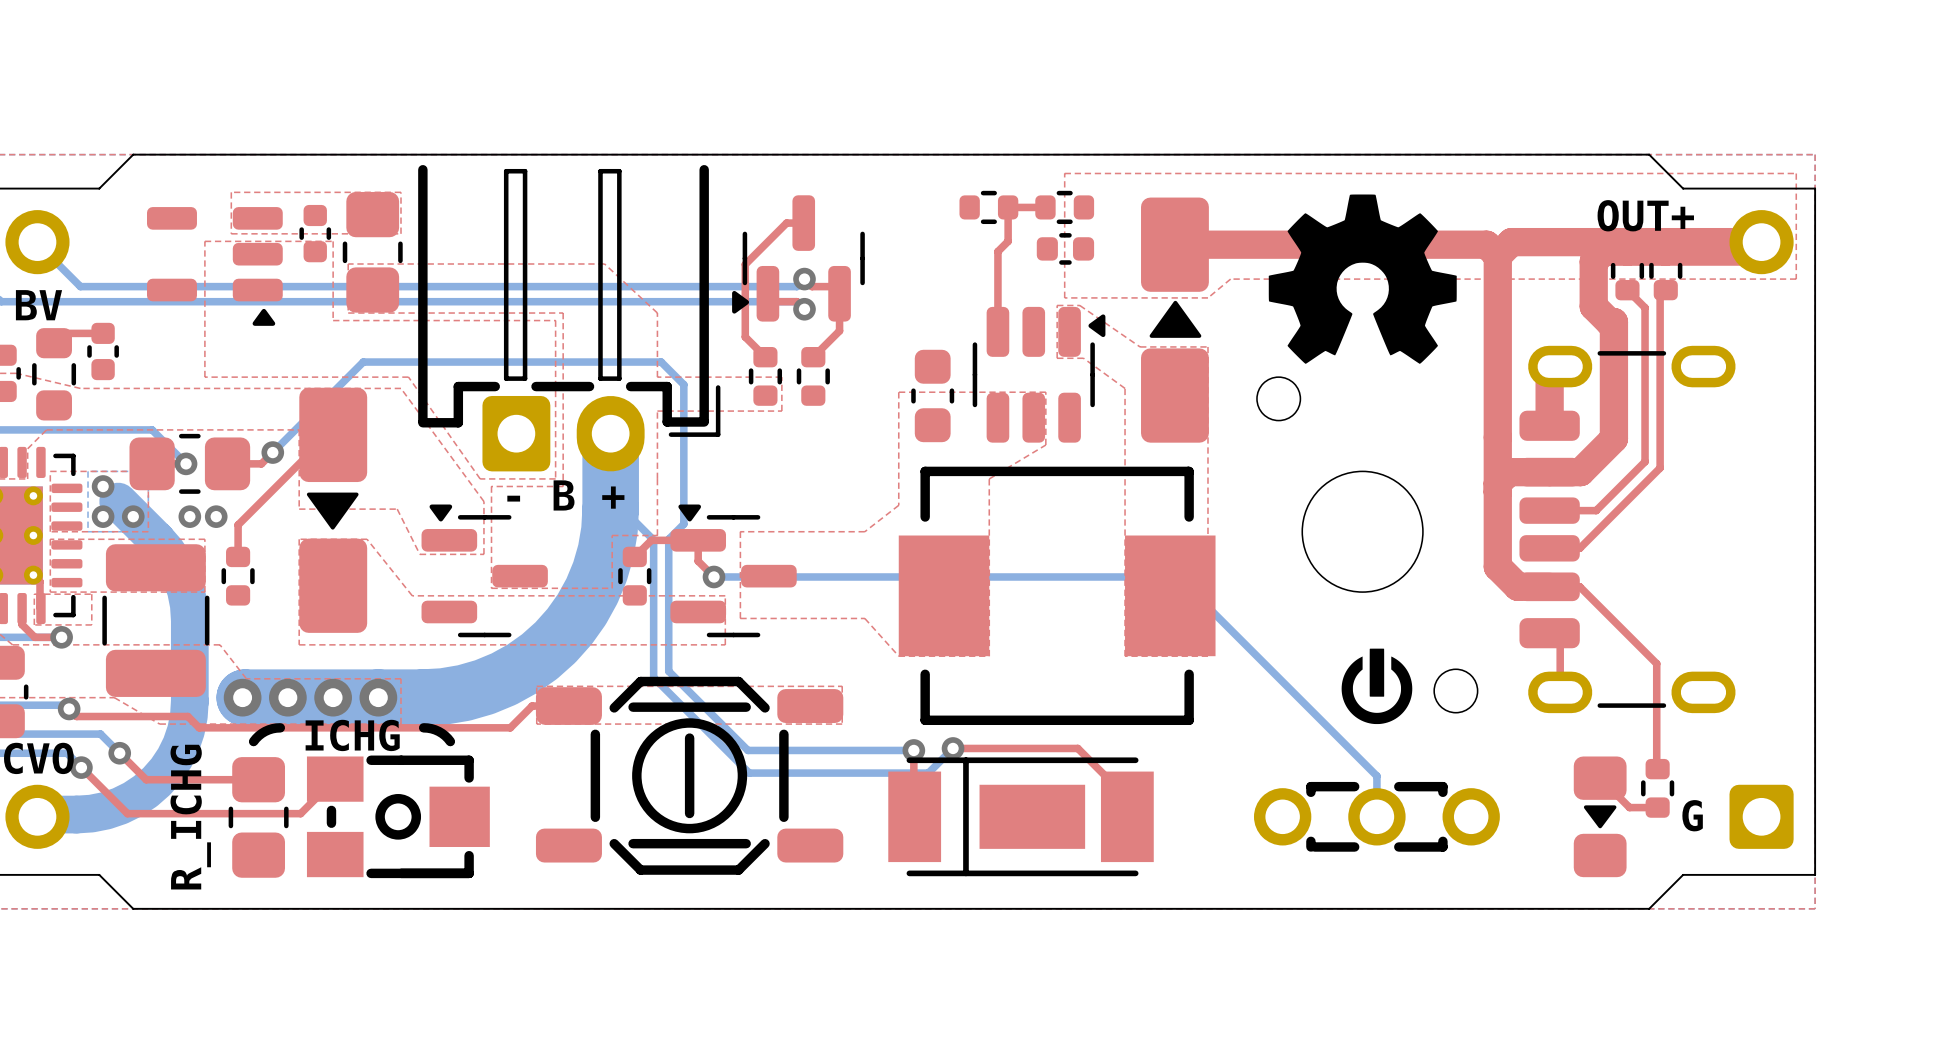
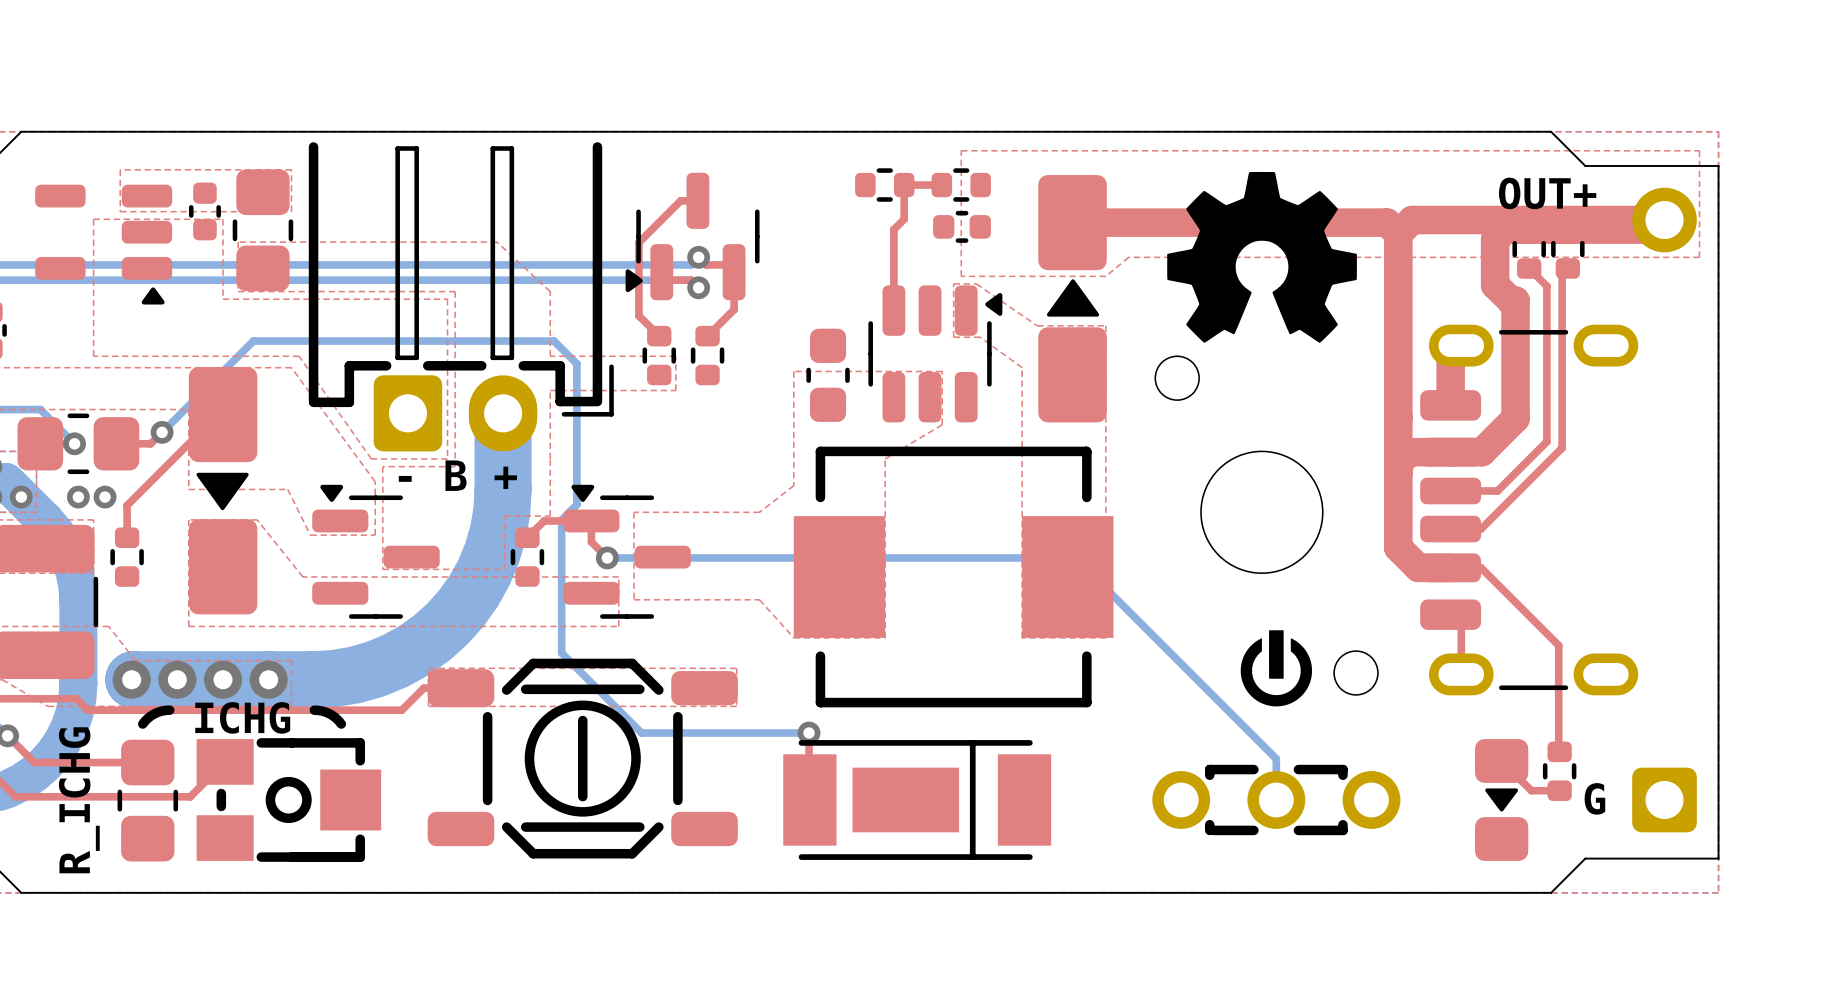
bottom track: (610, 433) (610, 497) (653, 540) (653, 677) (749, 773) (928, 773) (953, 748) -> none
top track: (953, 748) (1077, 748) (1127, 797) (1127, 816) -> none
via: (953, 748) -> none
part rotation: 0° (1021, 816) -> 180° (917, 799)

